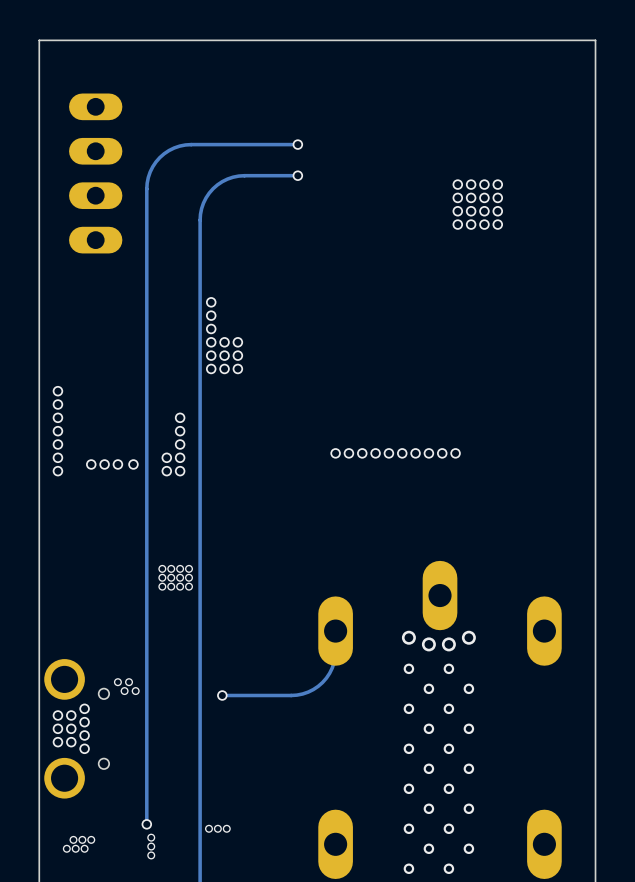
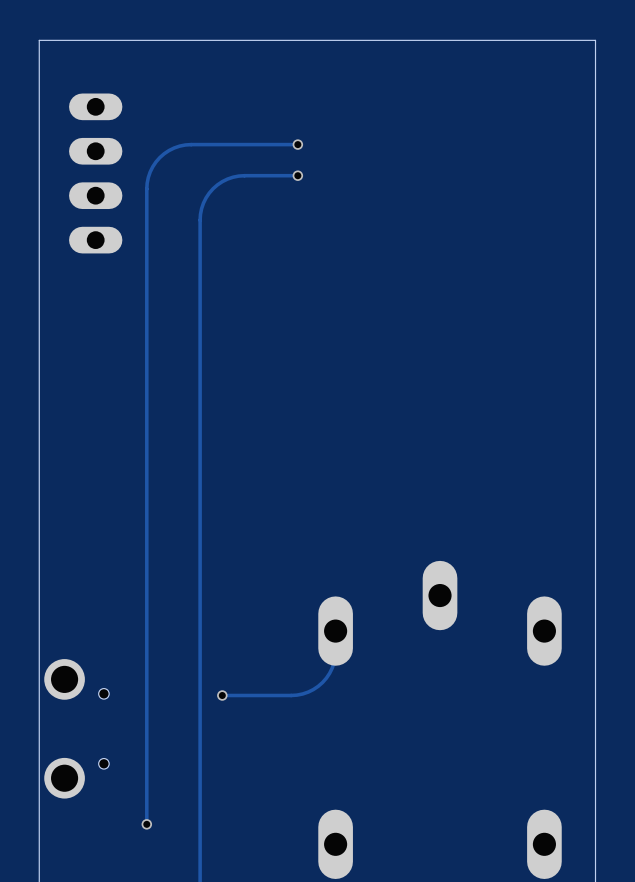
via: (457, 184) -> none
via: (471, 184) -> none
via: (484, 184) -> none
via: (497, 184) -> none
via: (457, 197) -> none
via: (471, 197) -> none
via: (484, 197) -> none
via: (497, 197) -> none
via: (457, 211) -> none
via: (471, 211) -> none
via: (484, 211) -> none
via: (497, 211) -> none
via: (457, 224) -> none
via: (471, 224) -> none
via: (484, 224) -> none
via: (497, 224) -> none
via: (211, 302) -> none
via: (211, 315) -> none
via: (211, 328) -> none
via: (211, 342) -> none
via: (224, 342) -> none
via: (237, 342) -> none
via: (211, 355) -> none
via: (224, 355) -> none
via: (237, 355) -> none
via: (211, 368) -> none
via: (224, 368) -> none
via: (237, 368) -> none
via: (57, 391) -> none
via: (57, 404) -> none
via: (57, 417) -> none
via: (180, 417) -> none
via: (57, 431) -> none
via: (180, 431) -> none
via: (57, 444) -> none
via: (180, 444) -> none
via: (335, 453) -> none
via: (348, 453) -> none
via: (362, 453) -> none
via: (375, 453) -> none
via: (388, 453) -> none
via: (402, 453) -> none
via: (415, 453) -> none
via: (428, 453) -> none
via: (442, 453) -> none
via: (455, 453) -> none
via: (57, 457) -> none
via: (166, 457) -> none
via: (180, 457) -> none
via: (91, 464) -> none
via: (104, 464) -> none
via: (117, 464) -> none
via: (133, 464) -> none
via: (57, 471) -> none
via: (166, 471) -> none
via: (180, 471) -> none
via: (162, 568) -> none
via: (171, 568) -> none
via: (180, 568) -> none
via: (189, 568) -> none
via: (162, 577) -> none
via: (171, 577) -> none
via: (180, 577) -> none
via: (189, 577) -> none
via: (162, 586) -> none
via: (171, 586) -> none
via: (180, 586) -> none
via: (189, 586) -> none
via: (408, 637) -> none
via: (468, 637) -> none
via: (428, 644) -> none
via: (448, 644) -> none
via: (408, 668) -> none
via: (448, 668) -> none
via: (117, 682) -> none
via: (129, 682) -> none
via: (428, 688) -> none
via: (468, 688) -> none
via: (124, 691) -> none
via: (135, 691) -> none
via: (84, 708) -> none
via: (408, 708) -> none
via: (448, 708) -> none
via: (57, 715) -> none
via: (71, 715) -> none
via: (84, 722) -> none
via: (57, 728) -> none
via: (71, 728) -> none
via: (428, 728) -> none
via: (468, 728) -> none
via: (84, 735) -> none
via: (57, 742) -> none
via: (71, 742) -> none
via: (84, 748) -> none
via: (408, 748) -> none
via: (448, 748) -> none
via: (428, 768) -> none
via: (468, 768) -> none
via: (408, 788) -> none
via: (448, 788) -> none
via: (428, 808) -> none
via: (468, 808) -> none
via: (208, 828) -> none
via: (217, 828) -> none
via: (226, 828) -> none
via: (408, 828) -> none
via: (448, 828) -> none
via: (151, 837) -> none
via: (73, 839) -> none
via: (82, 839) -> none
via: (91, 839) -> none
via: (151, 846) -> none
via: (66, 848) -> none
via: (75, 848) -> none
via: (84, 848) -> none
via: (428, 848) -> none
via: (468, 848) -> none
via: (151, 855) -> none
via: (408, 868) -> none
via: (448, 868) -> none

